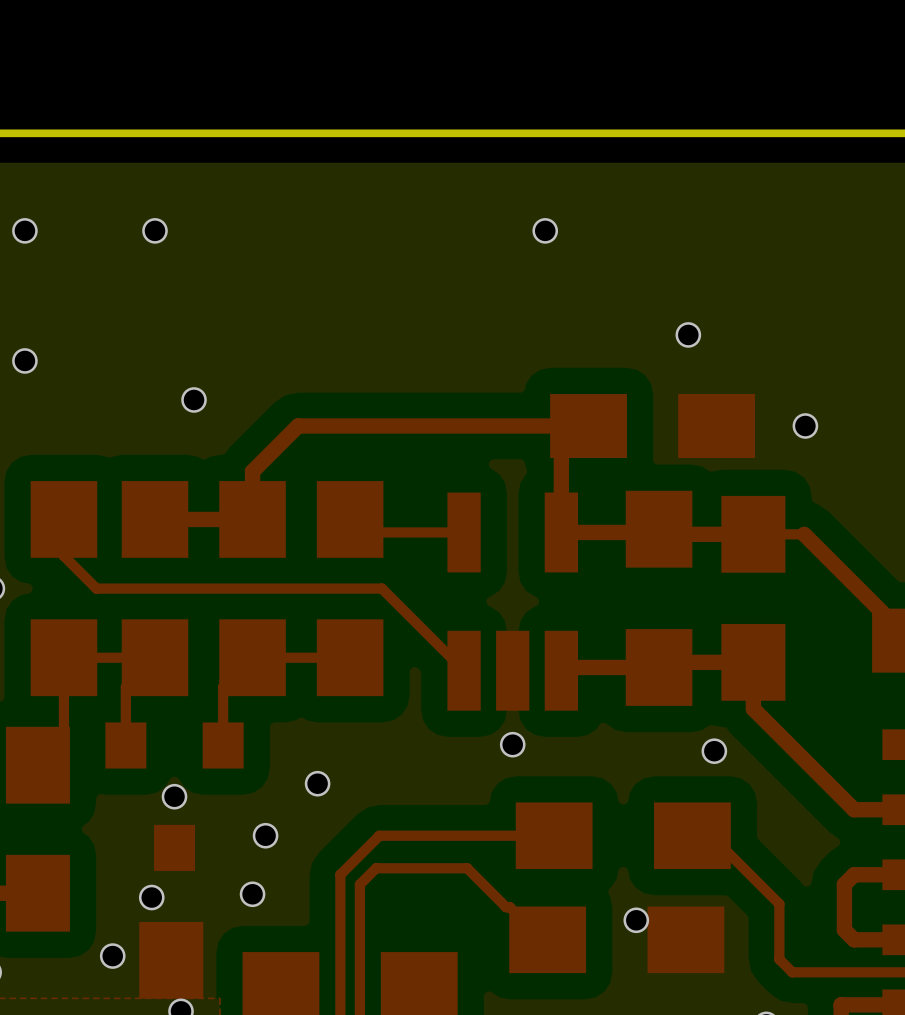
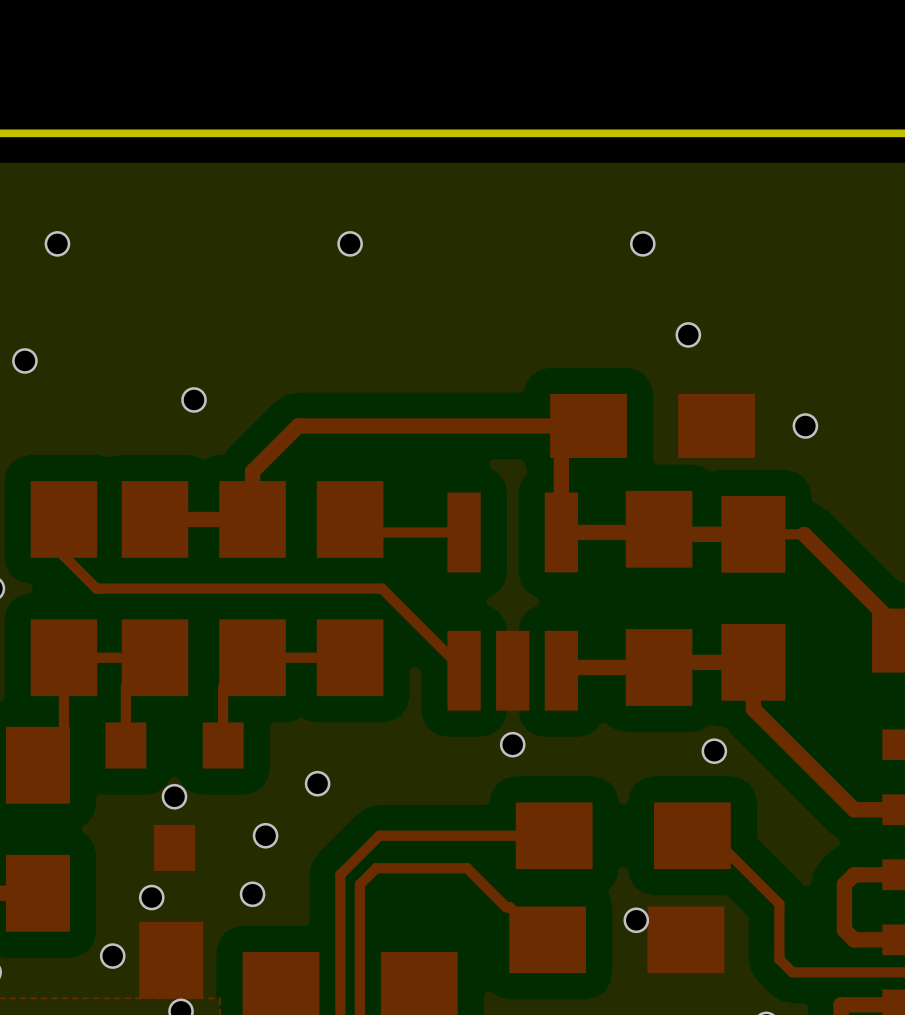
via position: (24, 230) -> (57, 243)
via: (155, 230) -> none
via: (545, 230) -> none
via: none -> (350, 243)
via: none -> (642, 243)

